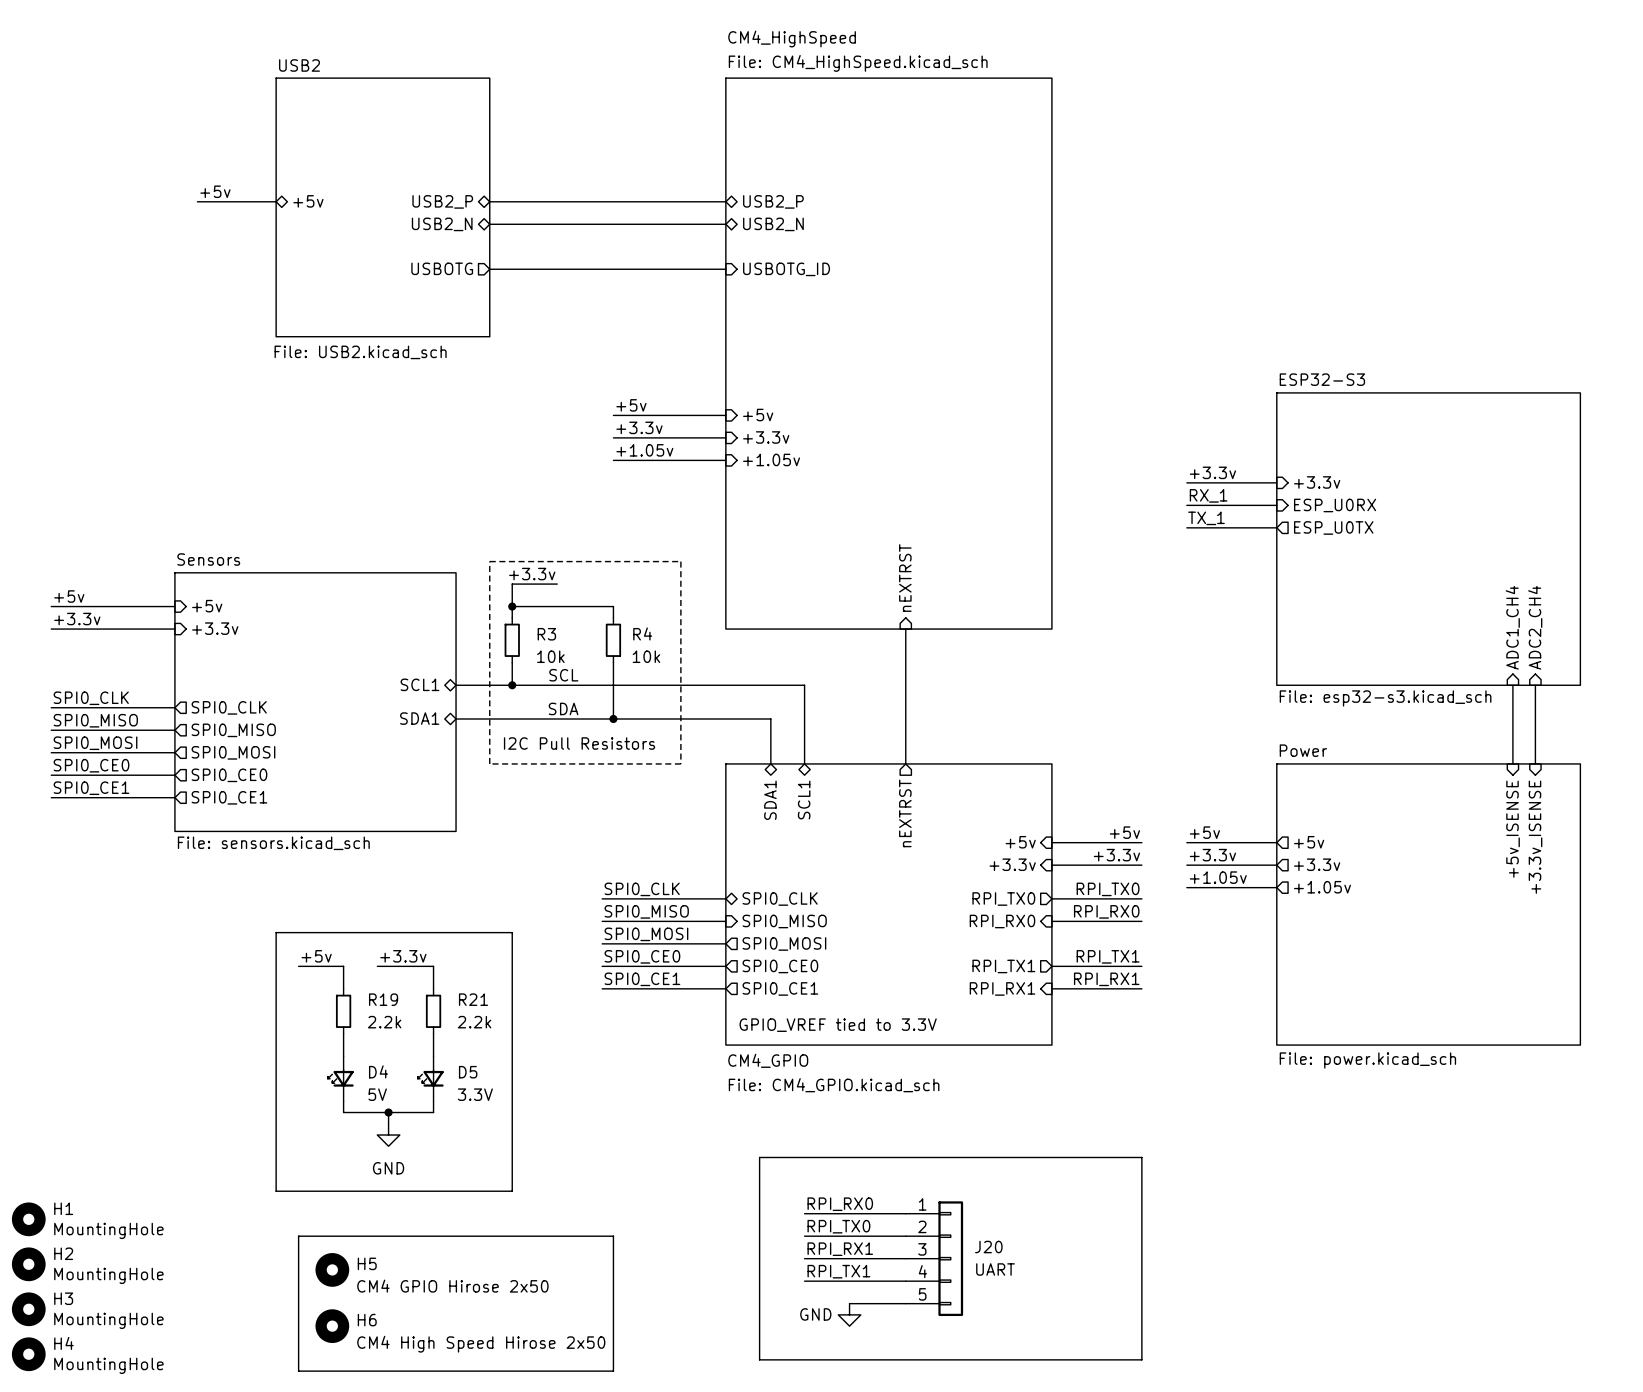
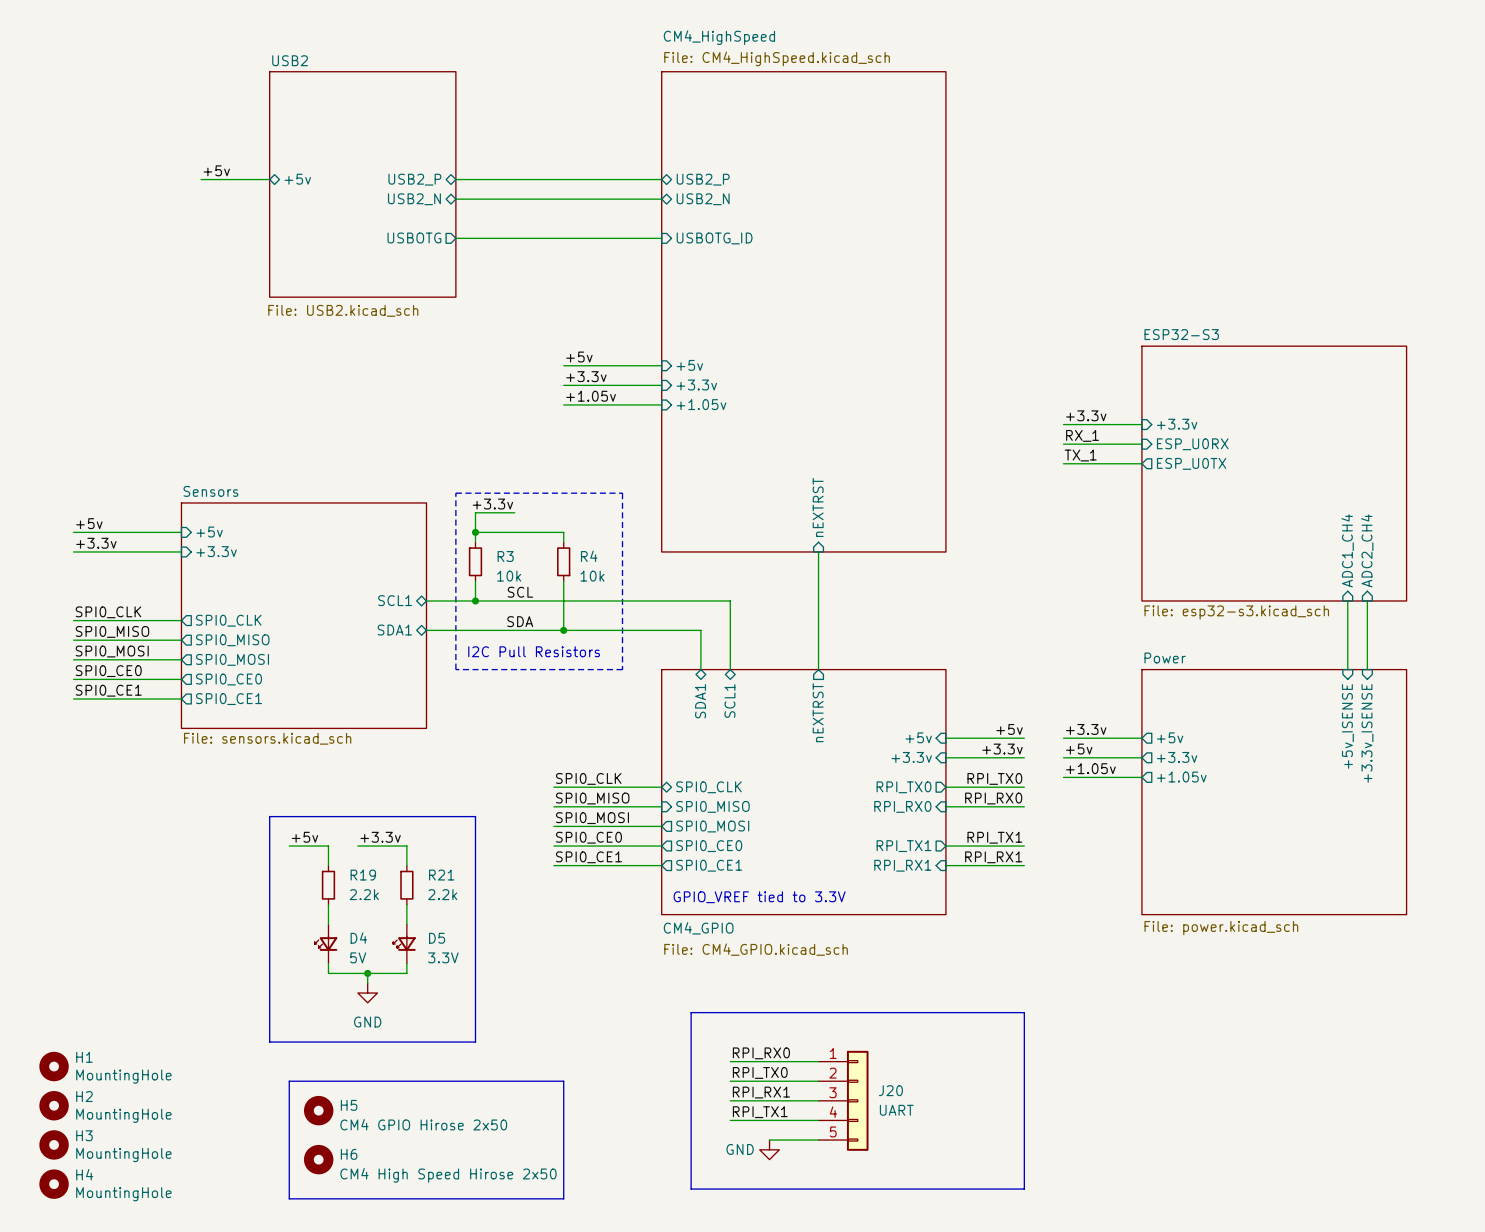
label: +5v (1204, 832) -> +3.3v (1086, 729)
label: +3.3v (1212, 855) -> +5v (1079, 749)

